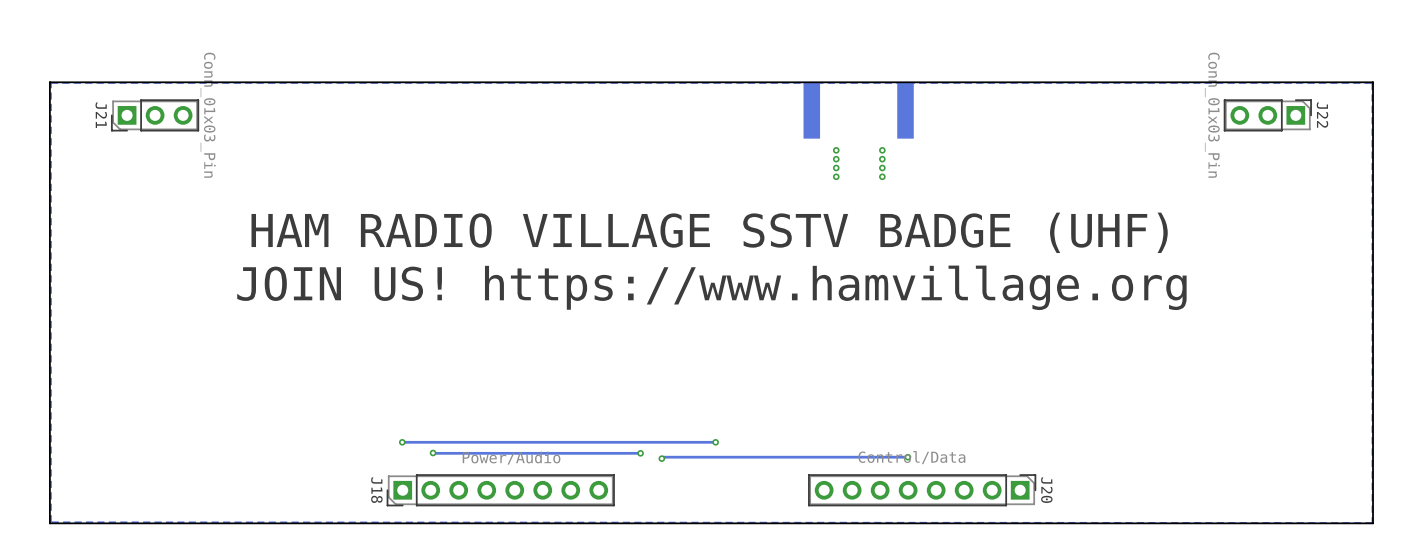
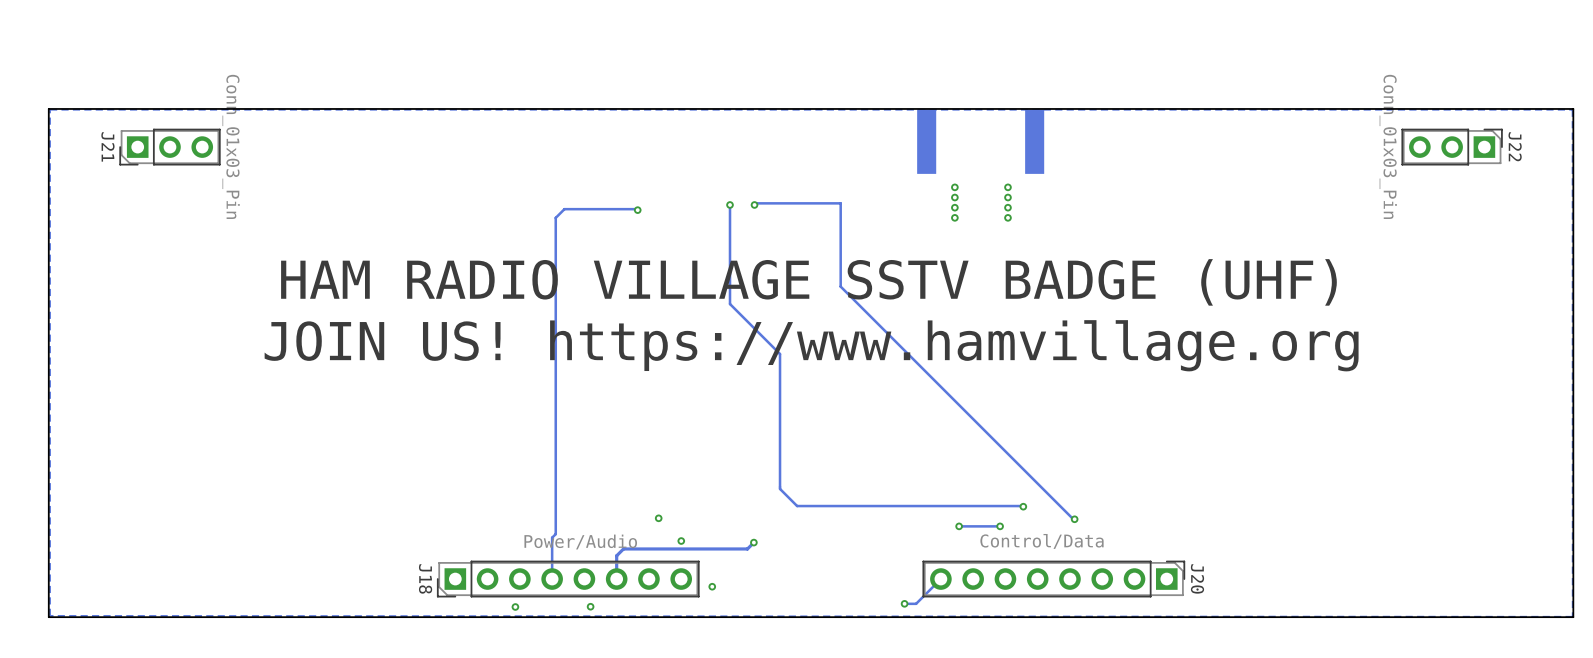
track: none -> (730, 204) (730, 304) (780, 354) (780, 488) (797, 506) (1023, 506)
via: none -> (730, 204)
track: none -> (754, 204) (756, 203) (840, 203) (840, 286) (1074, 519)
via: none -> (754, 204)
track: none -> (637, 210) (564, 209) (555, 217) (555, 534) (552, 537) (552, 579)
via: none -> (637, 210)
via: none -> (1023, 506)
via: none -> (658, 518)
via: none -> (1074, 519)
via: (402, 442) -> none
track: (715, 442) (402, 442) -> none
via: (715, 442) -> none
via: none -> (959, 526)
track: none -> (1000, 526) (959, 526)
via: none -> (1000, 526)
track: (433, 453) (640, 453) -> none
via: (433, 453) -> none
via: (640, 453) -> none
via: none -> (681, 541)
track: (907, 457) (661, 458) -> (616, 579) (616, 555) (623, 548) (747, 548) (753, 542)
via: (907, 457) -> none
track: none -> (940, 579) (916, 603) (904, 603)
via: none -> (712, 586)
via: none -> (904, 603)
via: none -> (515, 606)
via: none -> (590, 606)

